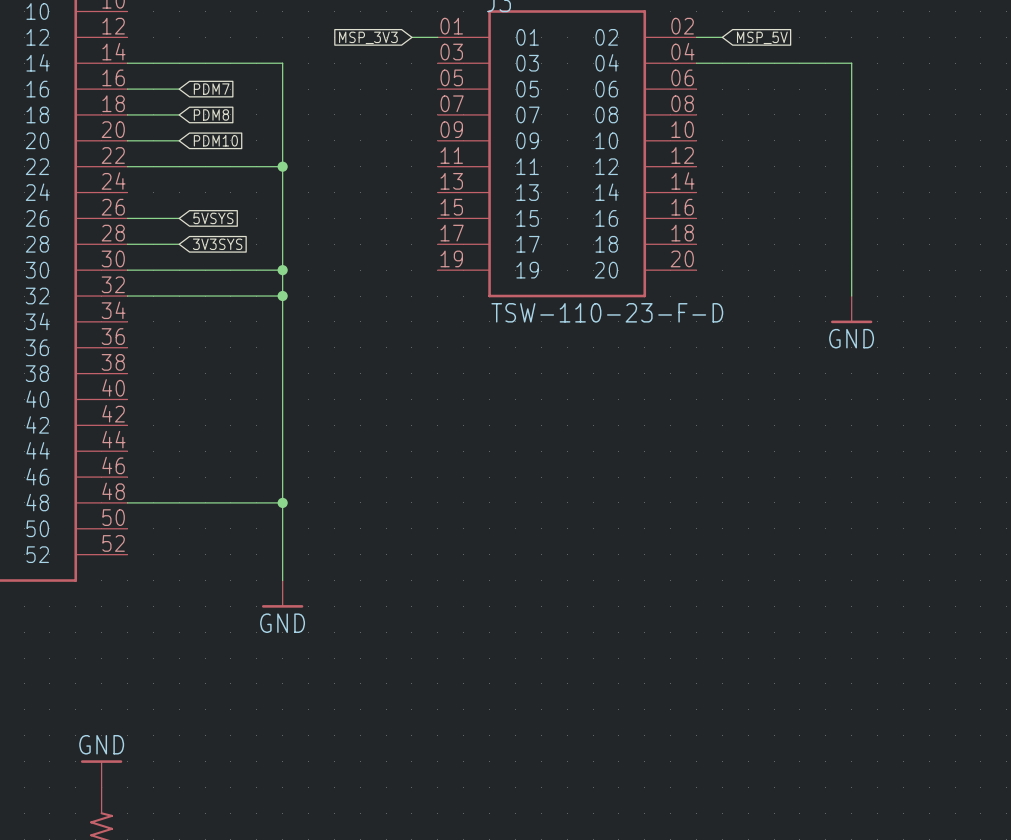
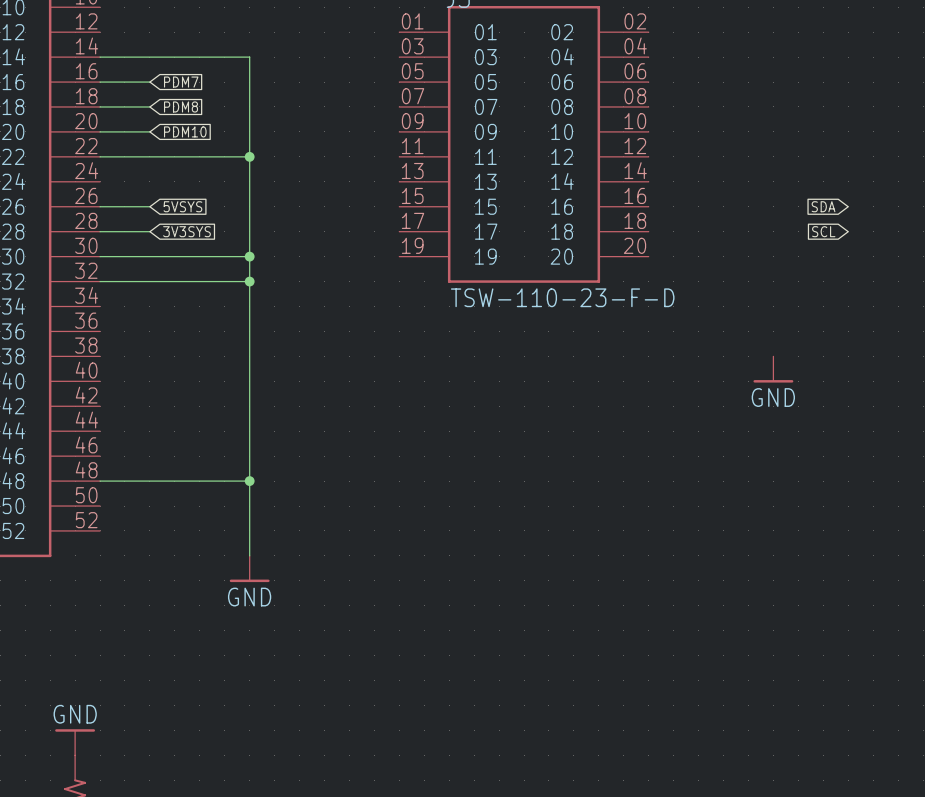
global label: MSP_3V3 (368, 37) -> none
wire: (411, 37) (437, 37) -> none
wire: (696, 37) (722, 37) -> none
global label: MSP_5V (762, 37) -> none
wire: (696, 63) (851, 63) (851, 296) -> none
global label: none -> SDA (823, 206)
global label: none -> SCL (823, 231)
power symbol position: GND (851, 309) -> GND (773, 369)

